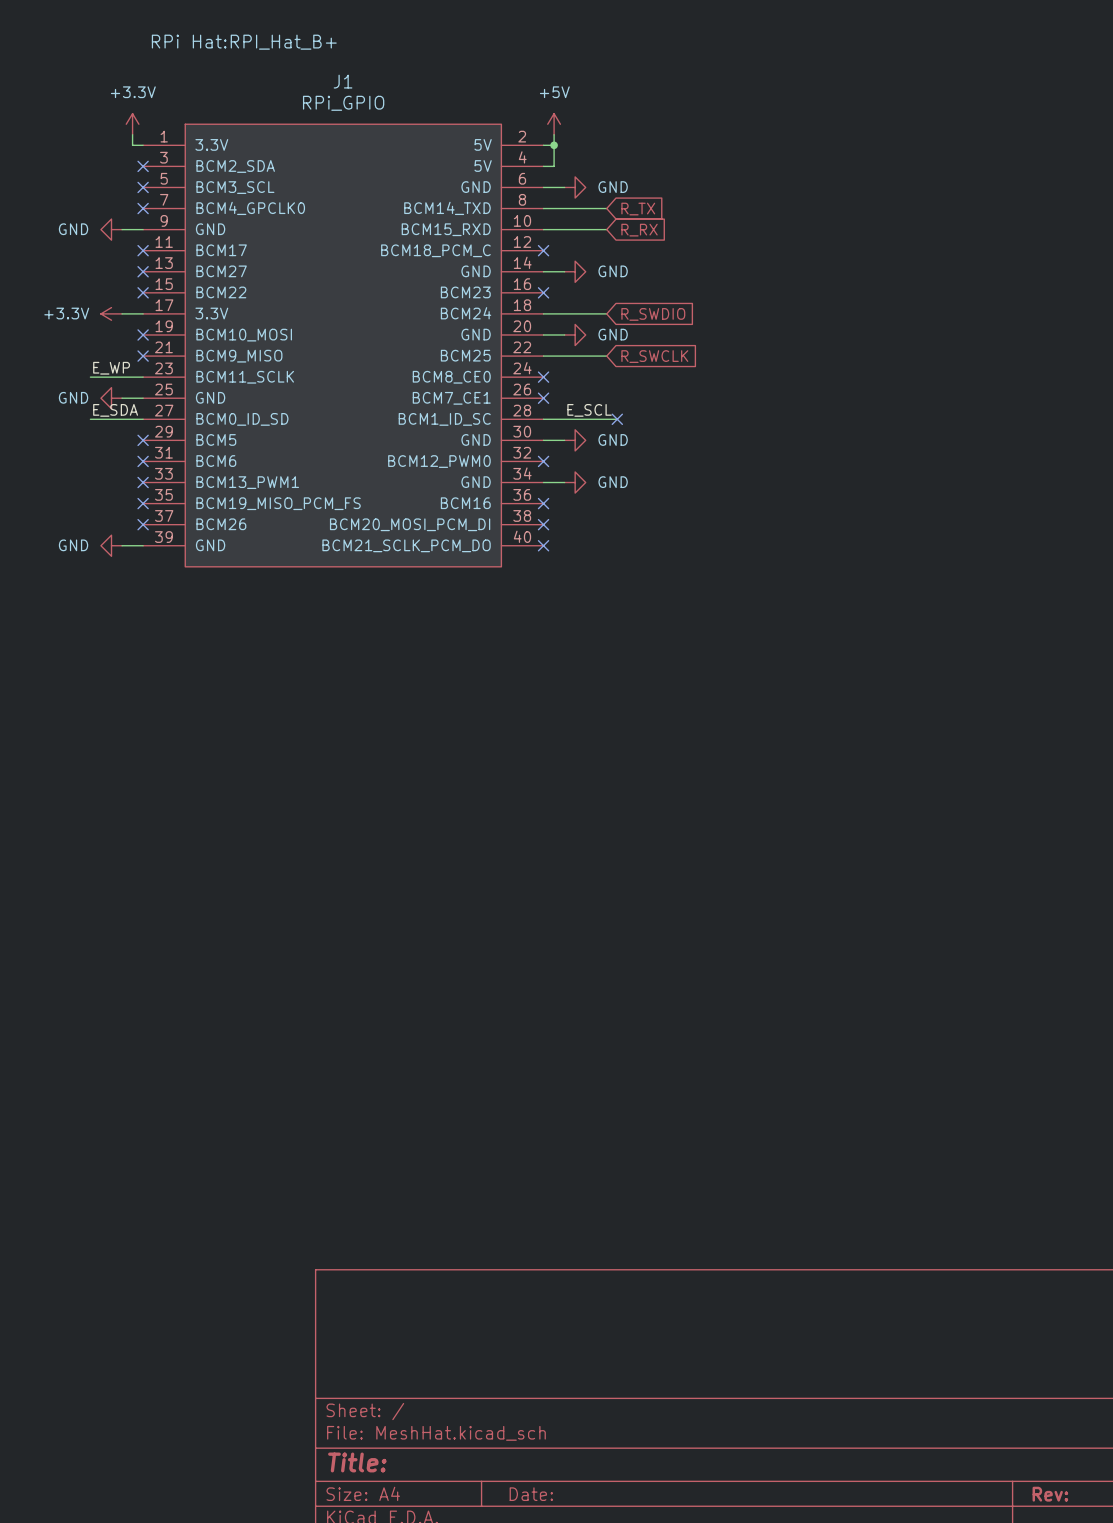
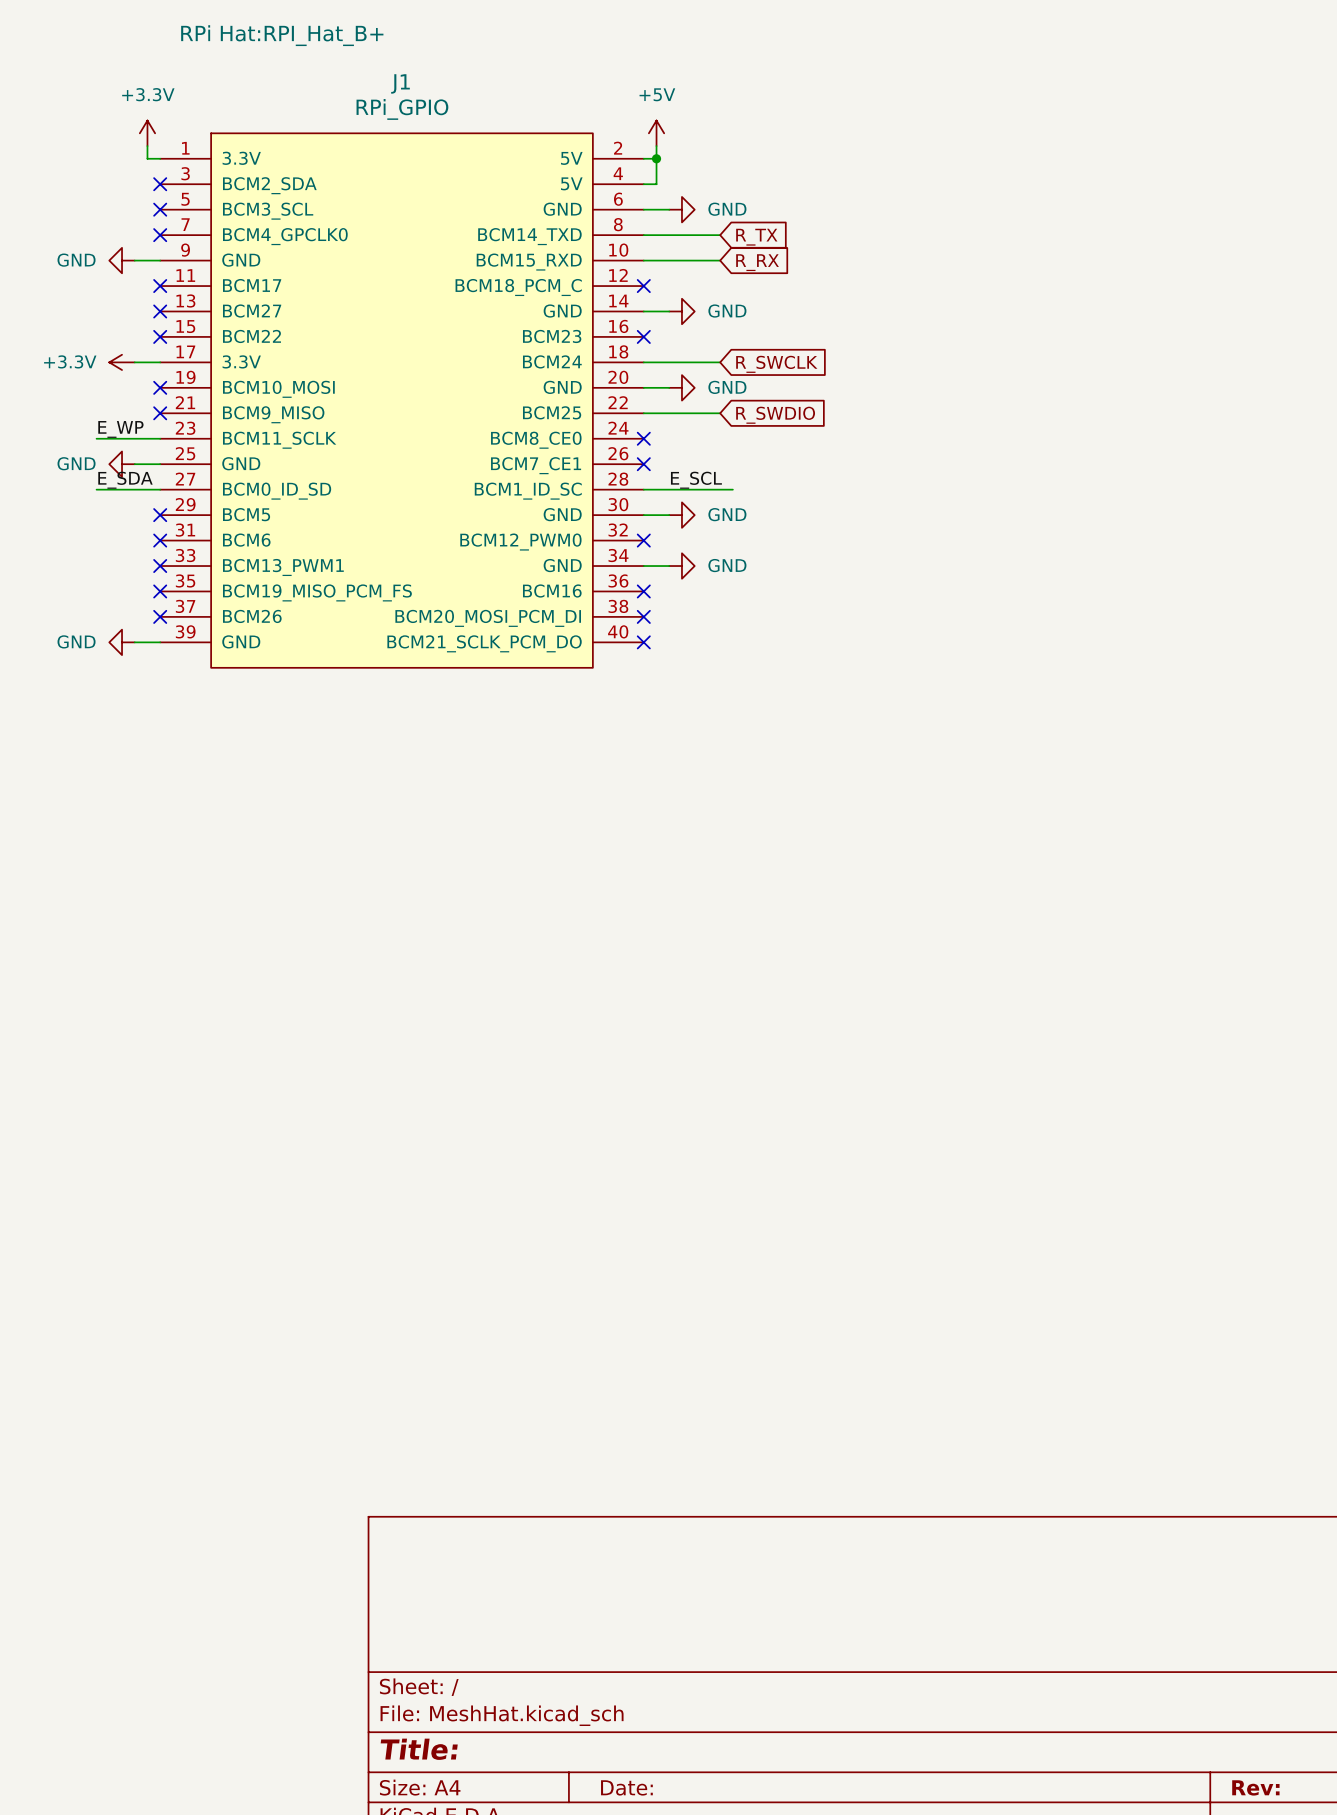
global label: R_SWDIO (653, 314) -> R_SWCLK (776, 364)
global label: R_SWCLK (654, 356) -> R_SWDIO (775, 415)
no-connect mark: (617, 419) -> none

